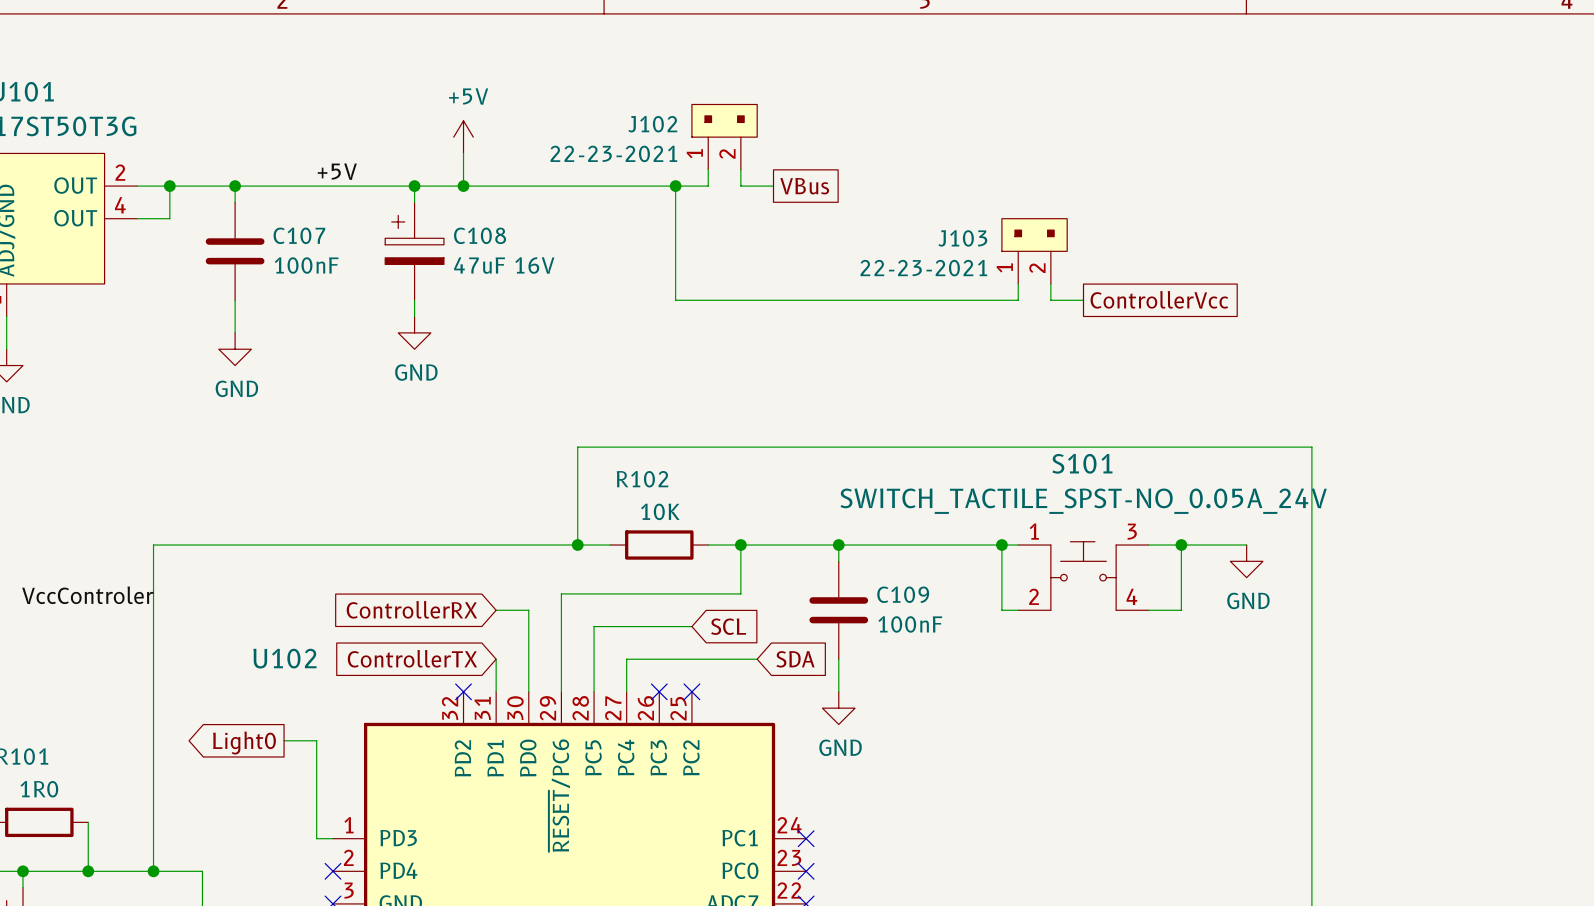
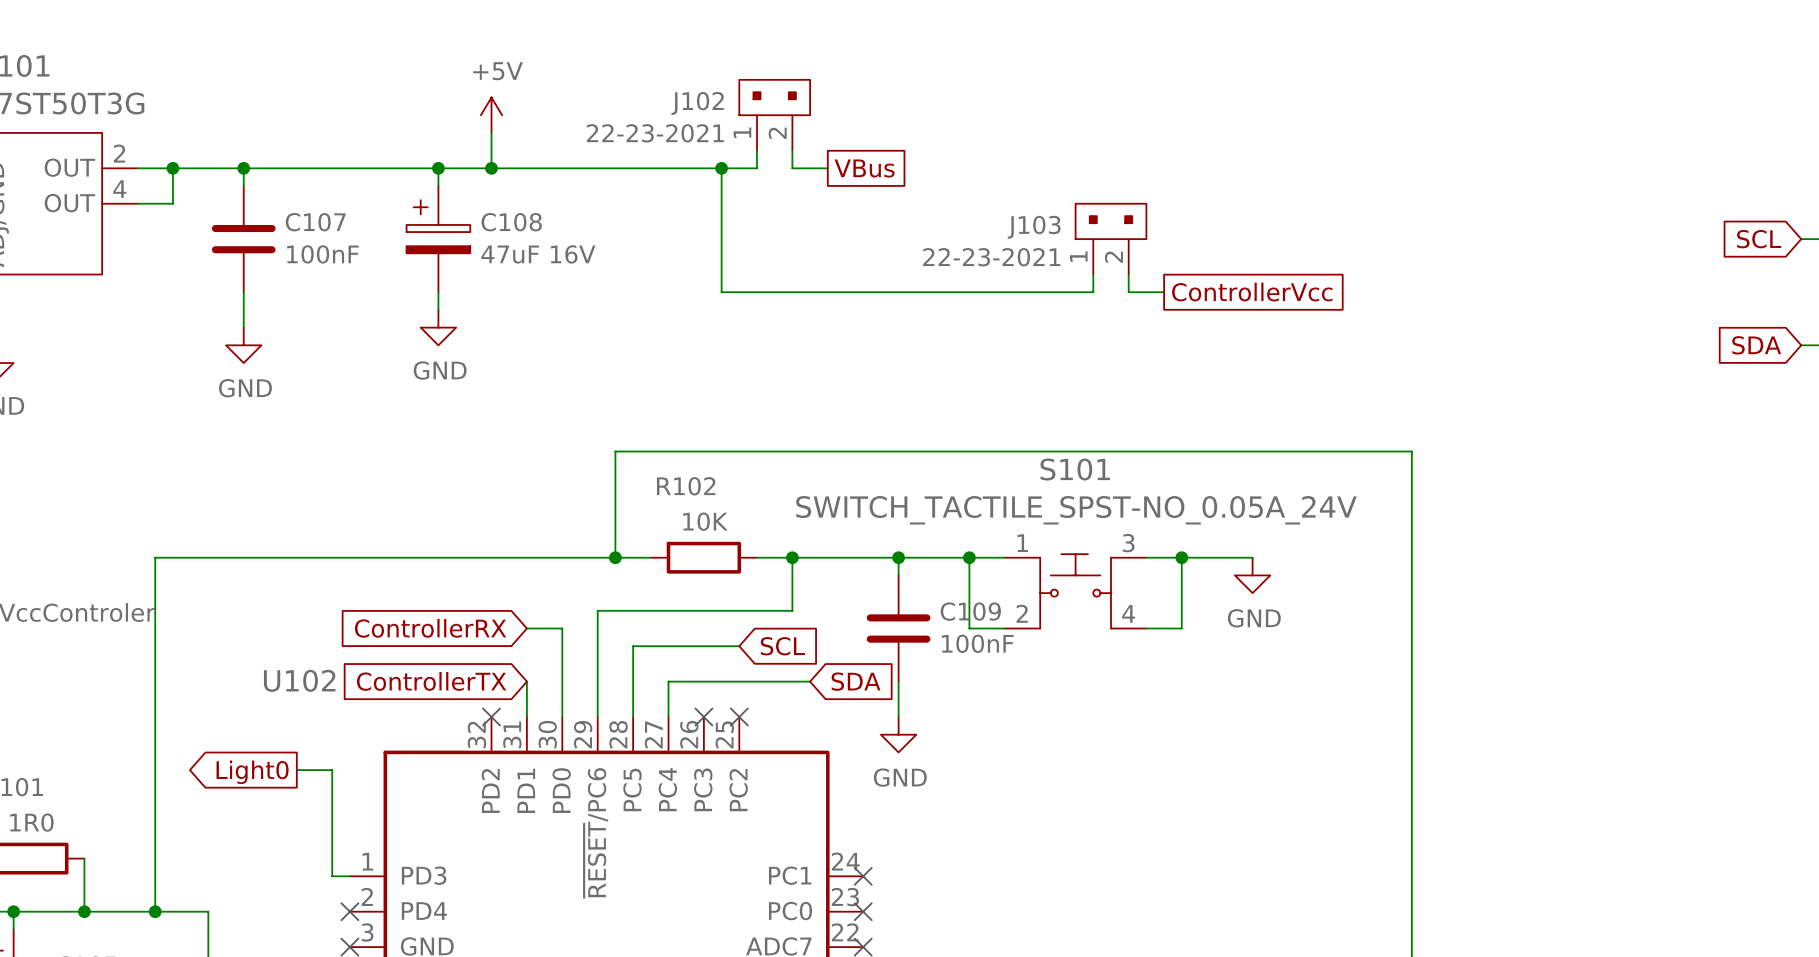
label: +5V (337, 171) -> none
wire: none -> (969, 557) (969, 628) (1004, 628)
junction: none -> (969, 557)
wire: (936, 545) (1018, 545) -> none
wire: (1001, 545) (1001, 610) (1018, 610) -> none
junction: (1001, 545) -> none
junction: none -> (1181, 557)
wire: (1165, 545) (1246, 545) -> (1146, 557) (1234, 557)
wire: (1181, 545) (1181, 610) (1148, 610) -> (1181, 557) (1181, 628) (1146, 628)
junction: (1181, 545) -> none
power symbol position: GND (1246, 561) -> GND (1252, 575)
S101 position: (1083, 576) -> (1075, 591)

